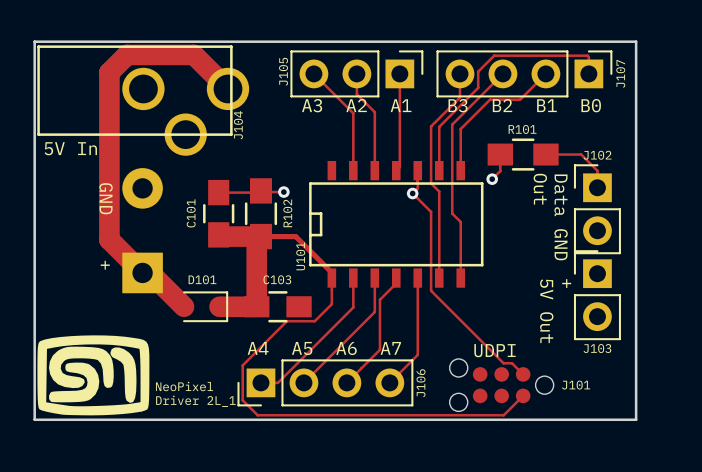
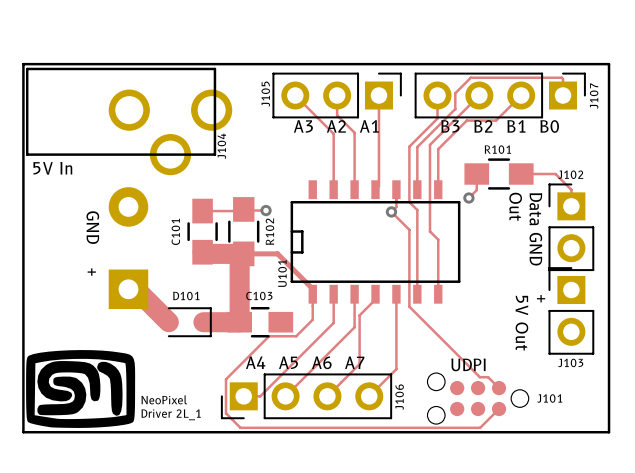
track: (228, 88) (193, 54) (127, 54) (109, 72) (109, 239) (142, 272) -> none

